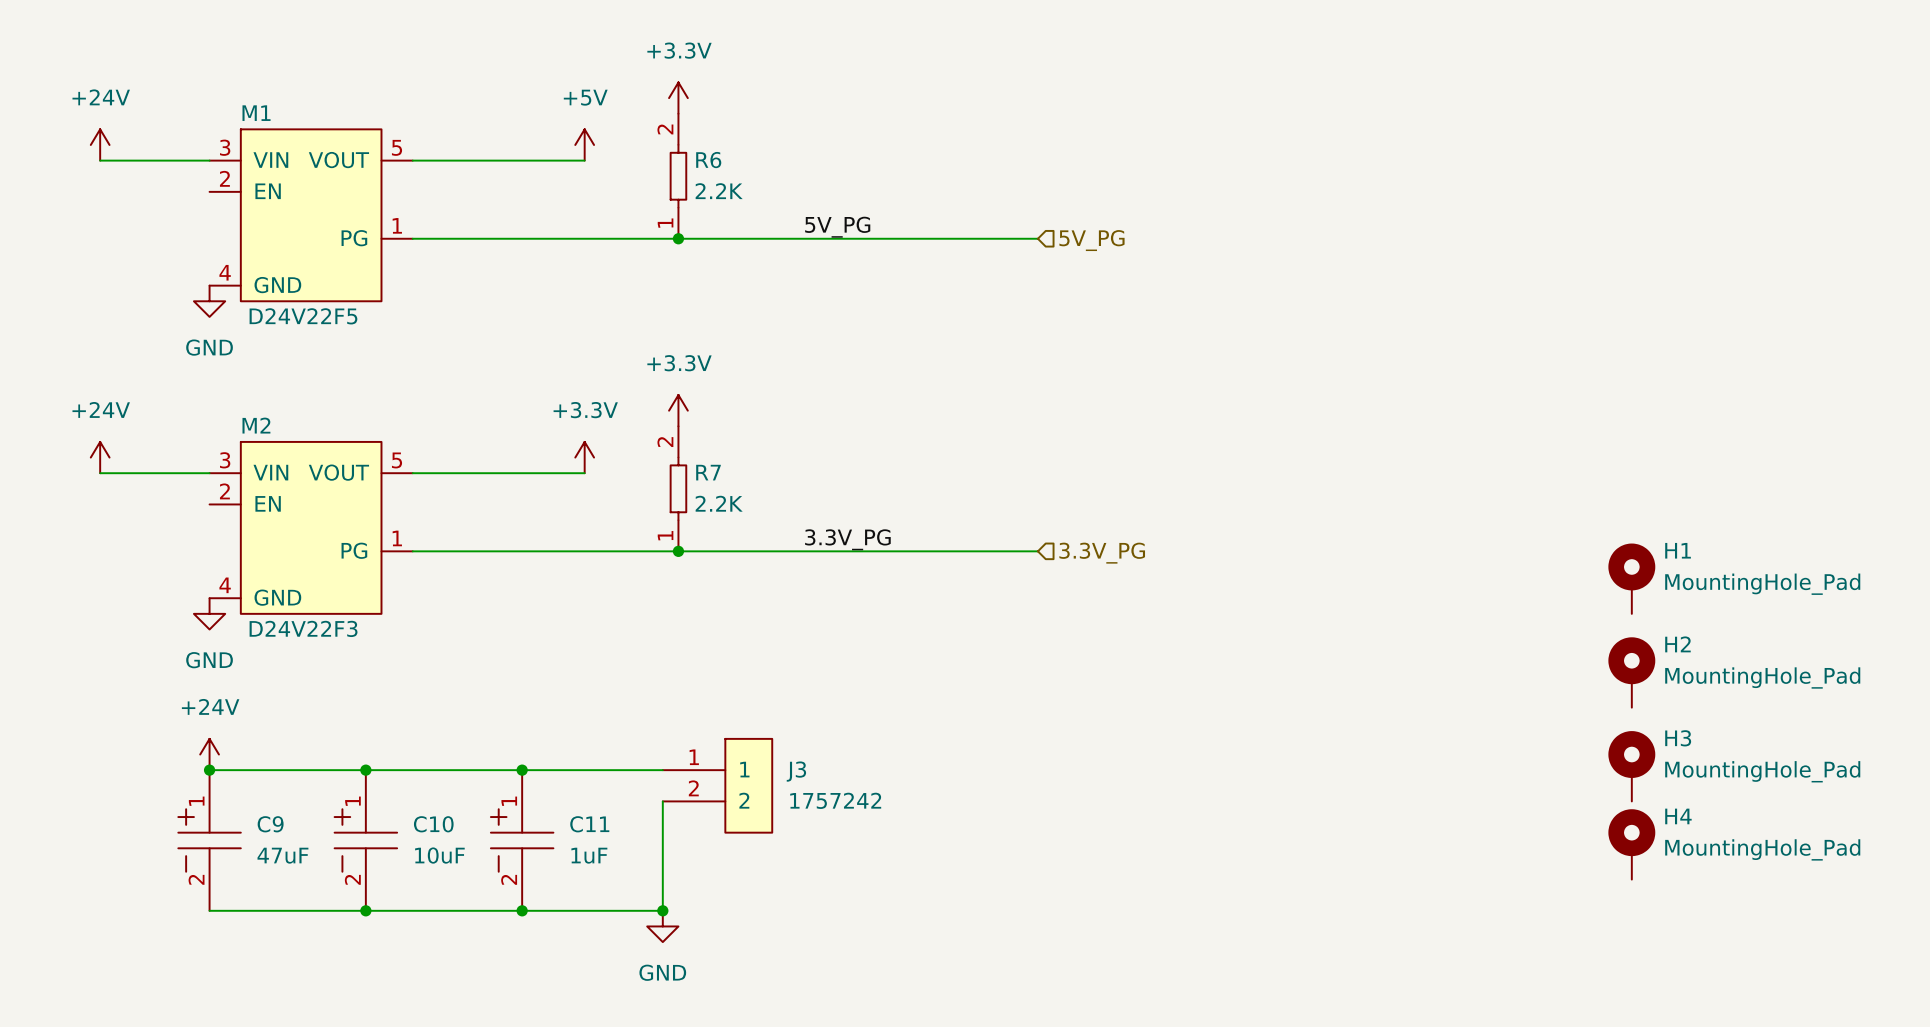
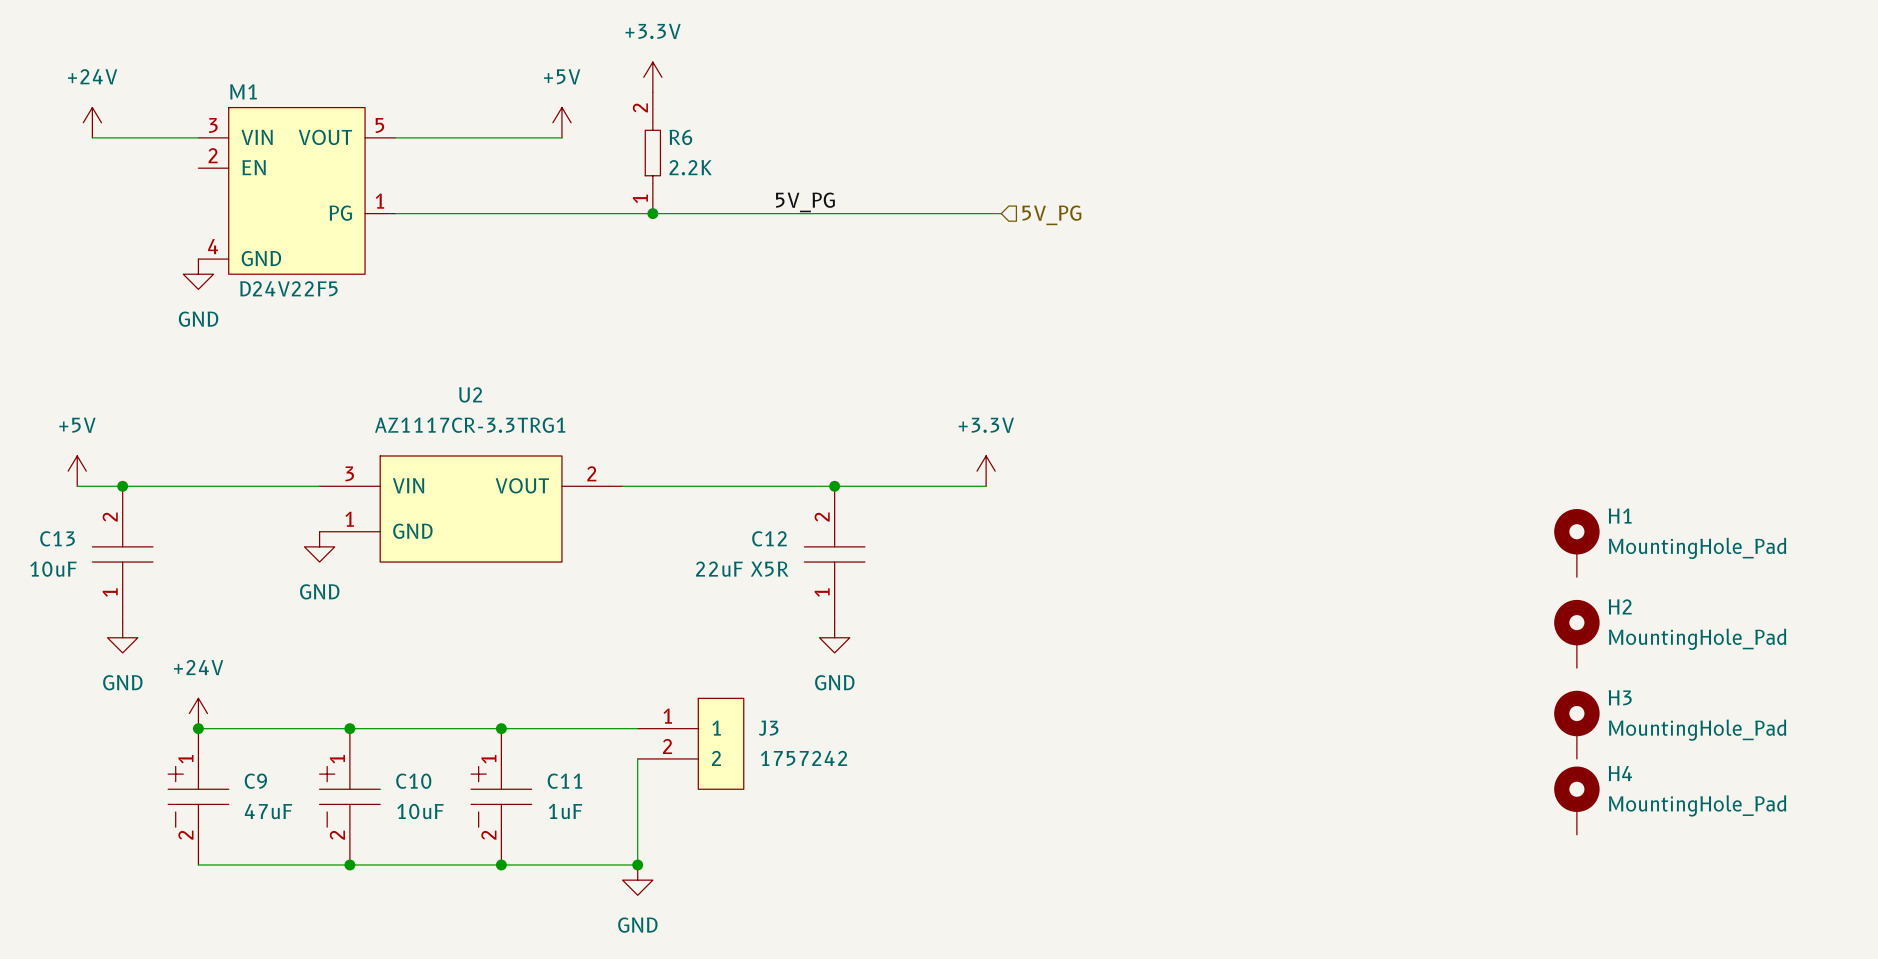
power symbol: +3.3V (678, 410) -> none
power symbol: +24V (100, 457) -> none
power symbol: +3.3V (584, 457) -> none
wire: (100, 473) (209, 473) -> none
wire: (412, 473) (584, 473) -> none
R7: (678, 488) -> none
power symbol: none -> +5V (77, 471)
power symbol: none -> +3.3V (986, 471)
wire: none -> (77, 486) (319, 486)
junction: none -> (122, 486)
wire: none -> (622, 486) (986, 486)
junction: none -> (834, 486)
M2: (311, 527) -> none
label: 3.3V_PG (847, 539) -> none
U2: none -> (471, 509)
wire: (412, 551) (1037, 551) -> none
junction: (678, 551) -> none
hierarchical label: 3.3V_PG (1102, 553) -> none
power symbol: none -> GND (319, 546)
C13: none -> (122, 554)
C12: none -> (834, 554)
power symbol: GND (209, 613) -> none
power symbol: none -> GND (122, 637)
power symbol: none -> GND (834, 637)

